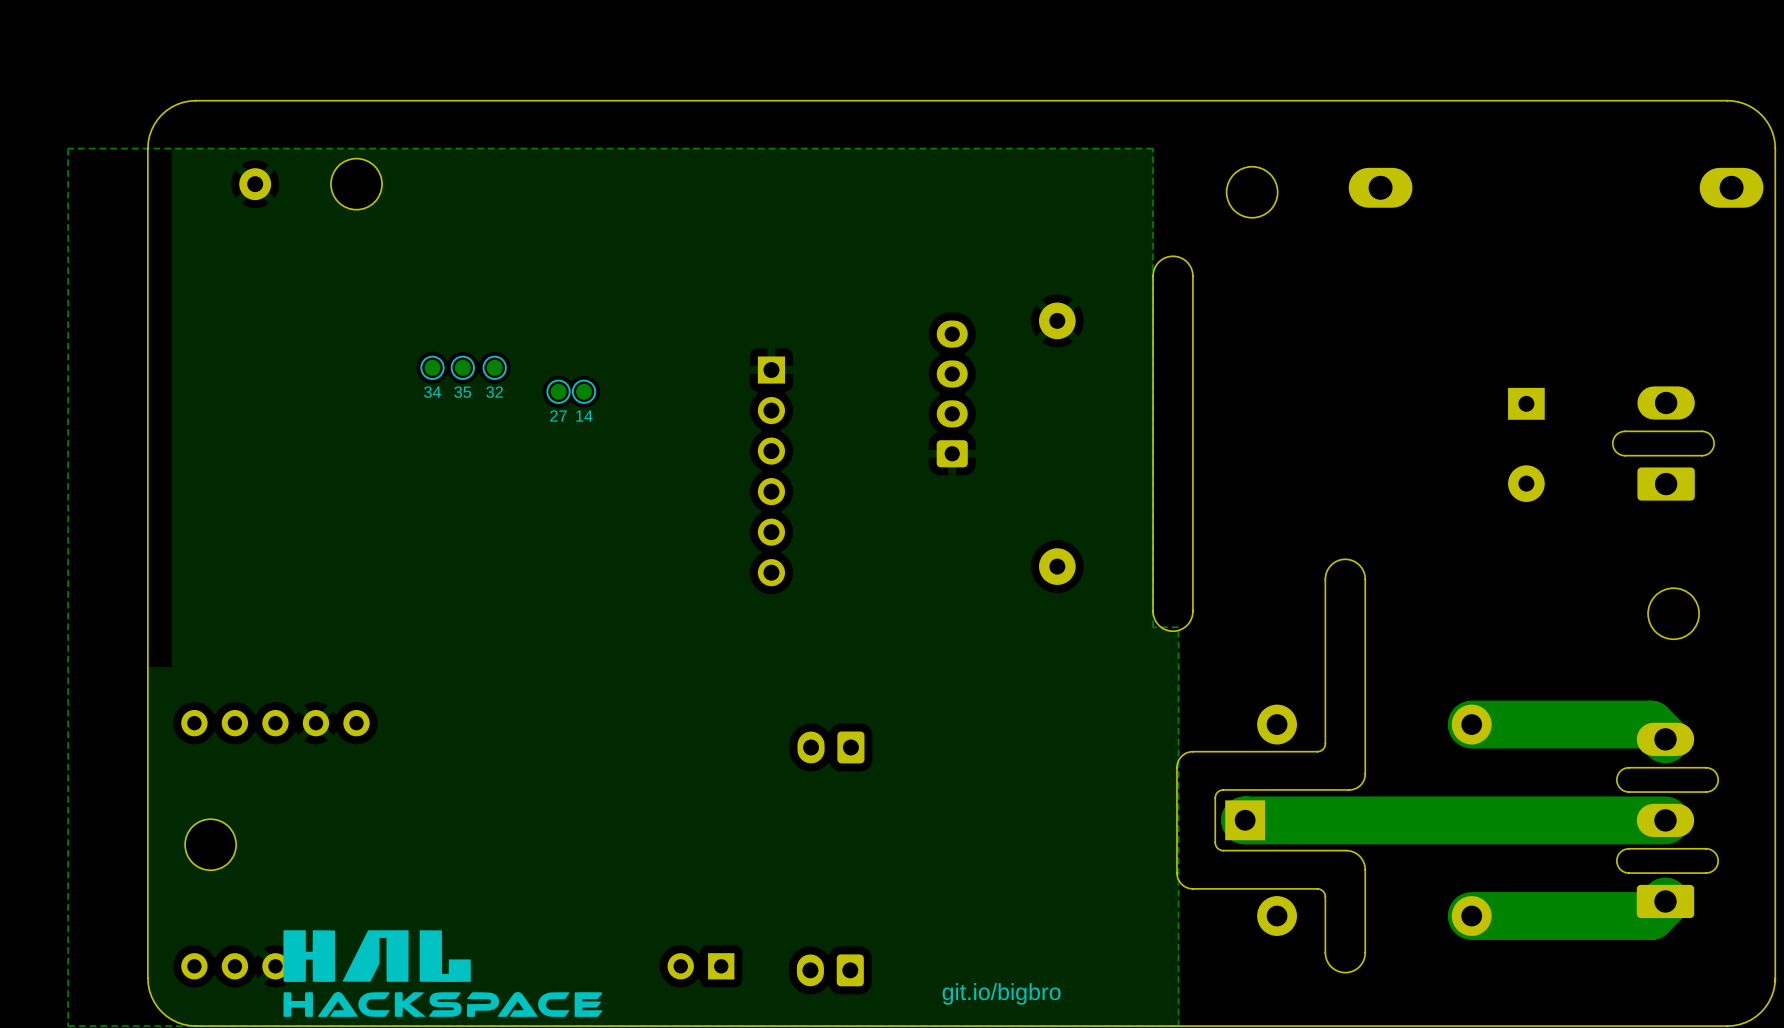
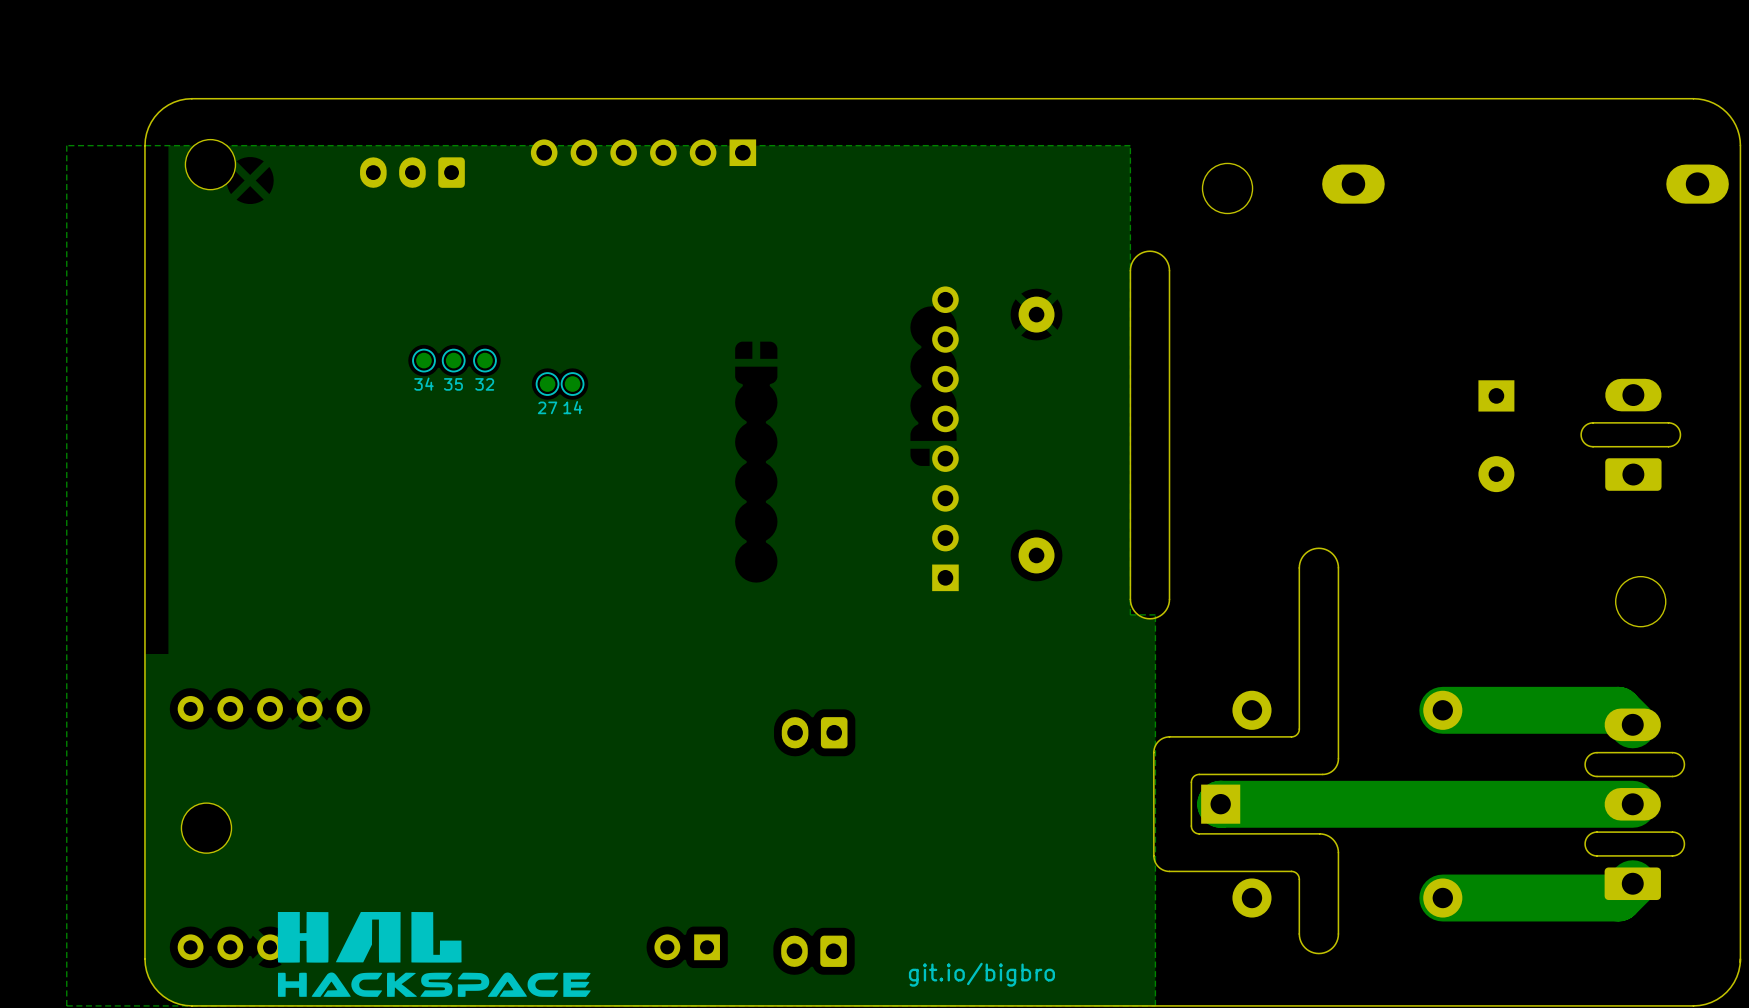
part: none -> (412, 172)
part: (255, 184) -> none
part position: (356, 184) -> (210, 164)
part: (952, 393) -> none
part: none -> (945, 438)
part rotation: 0° (771, 471) -> 90° clockwise (643, 152)
part position: (771, 471) -> (643, 152)

